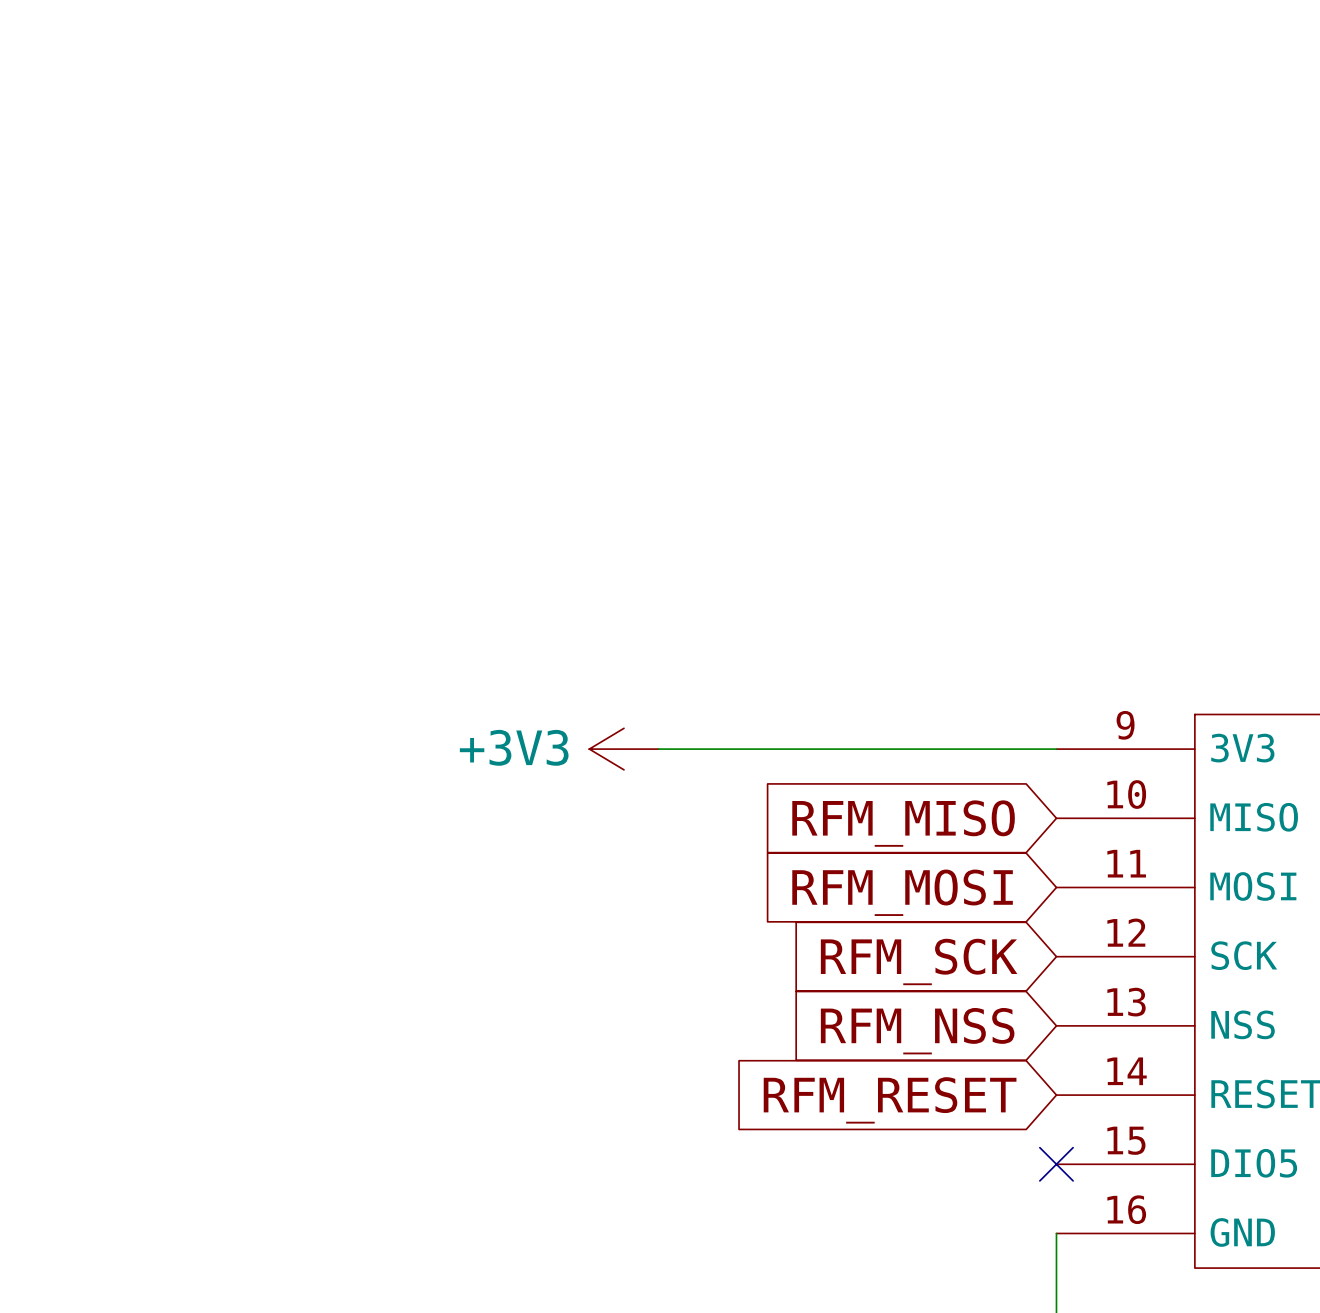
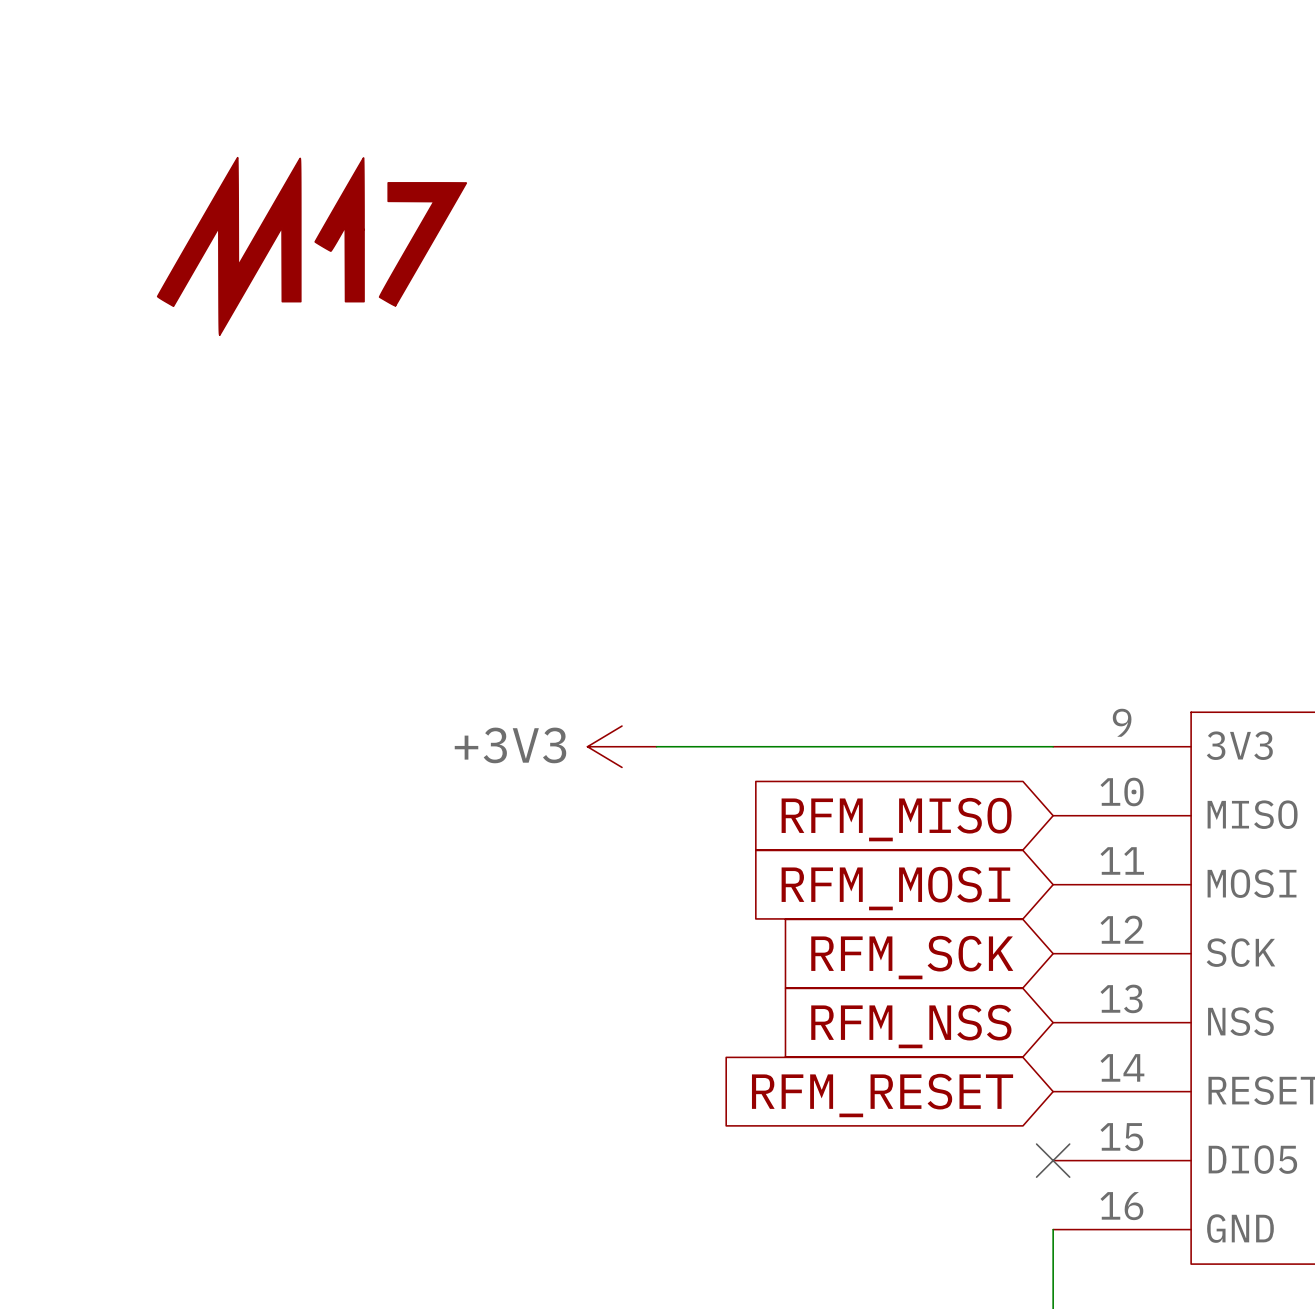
power symbol: none -> (311, 246)

